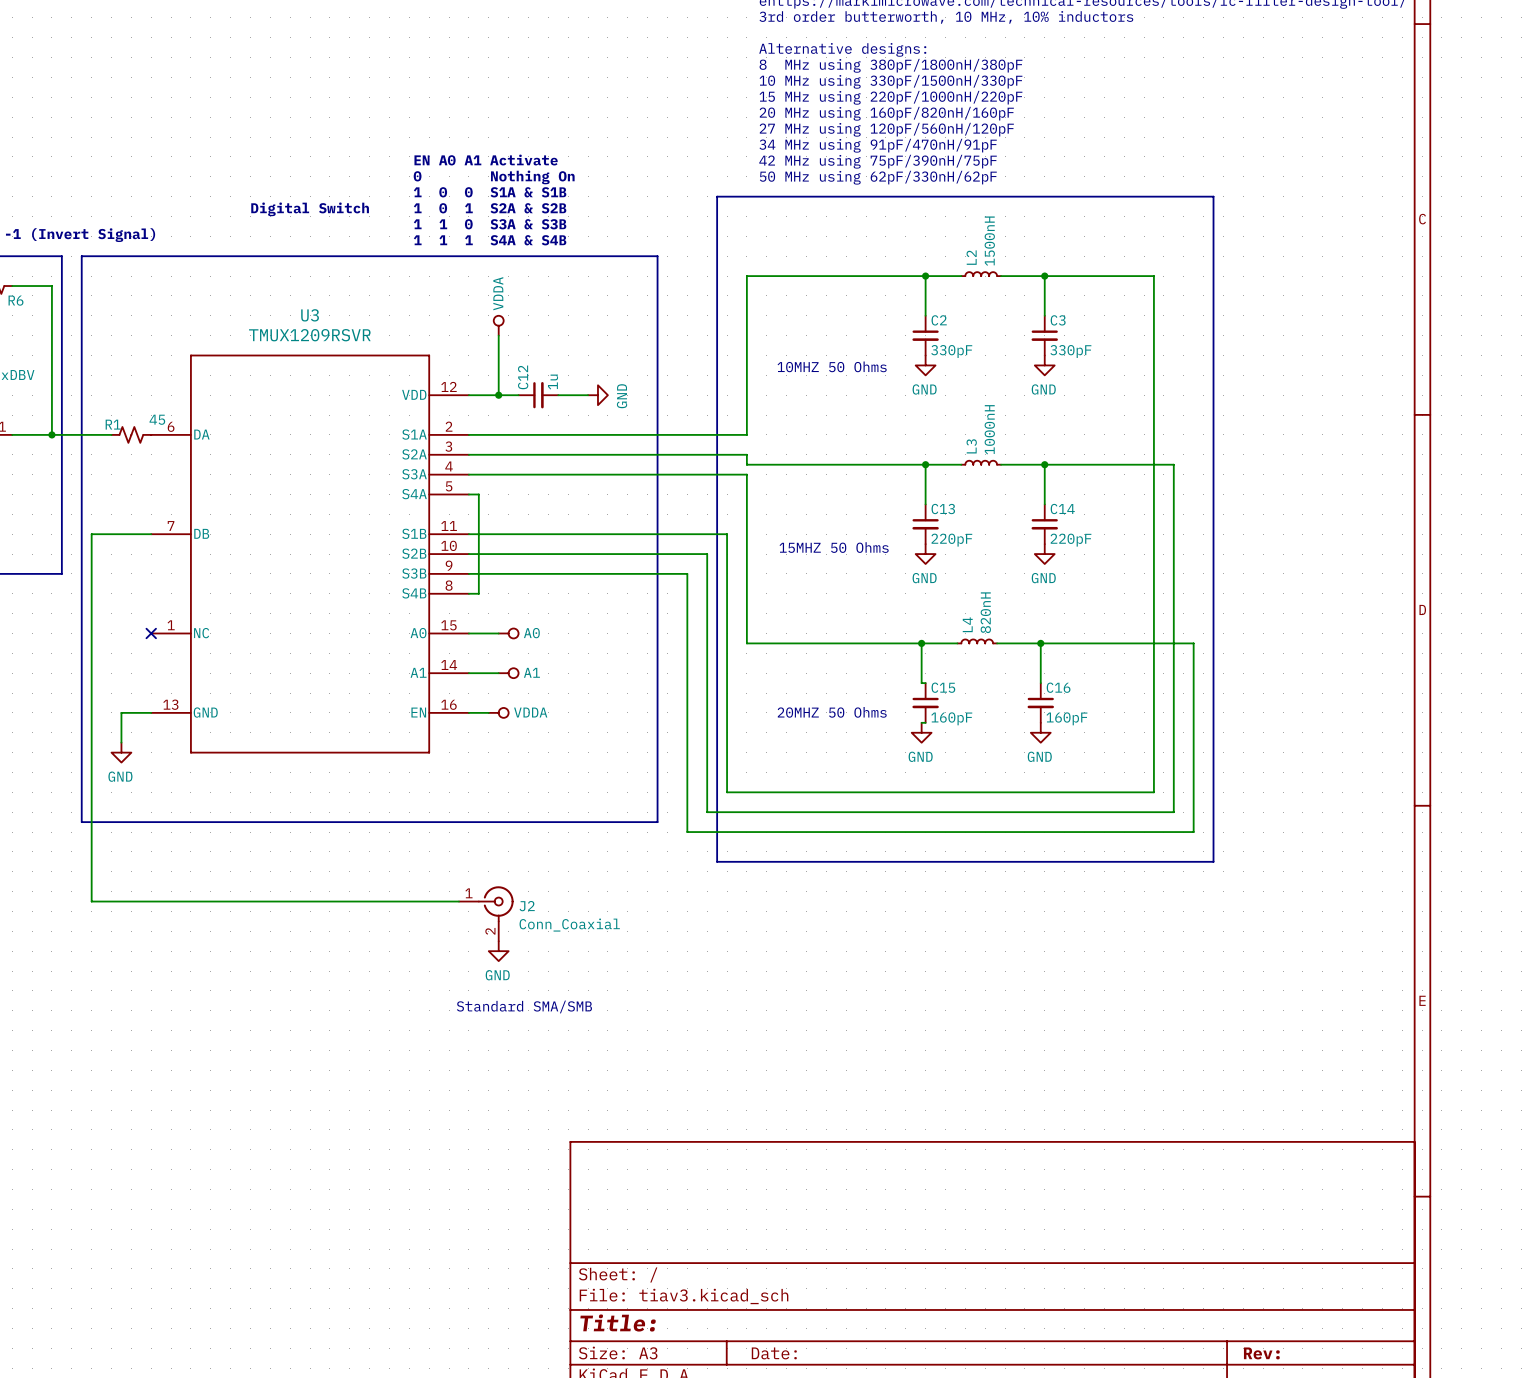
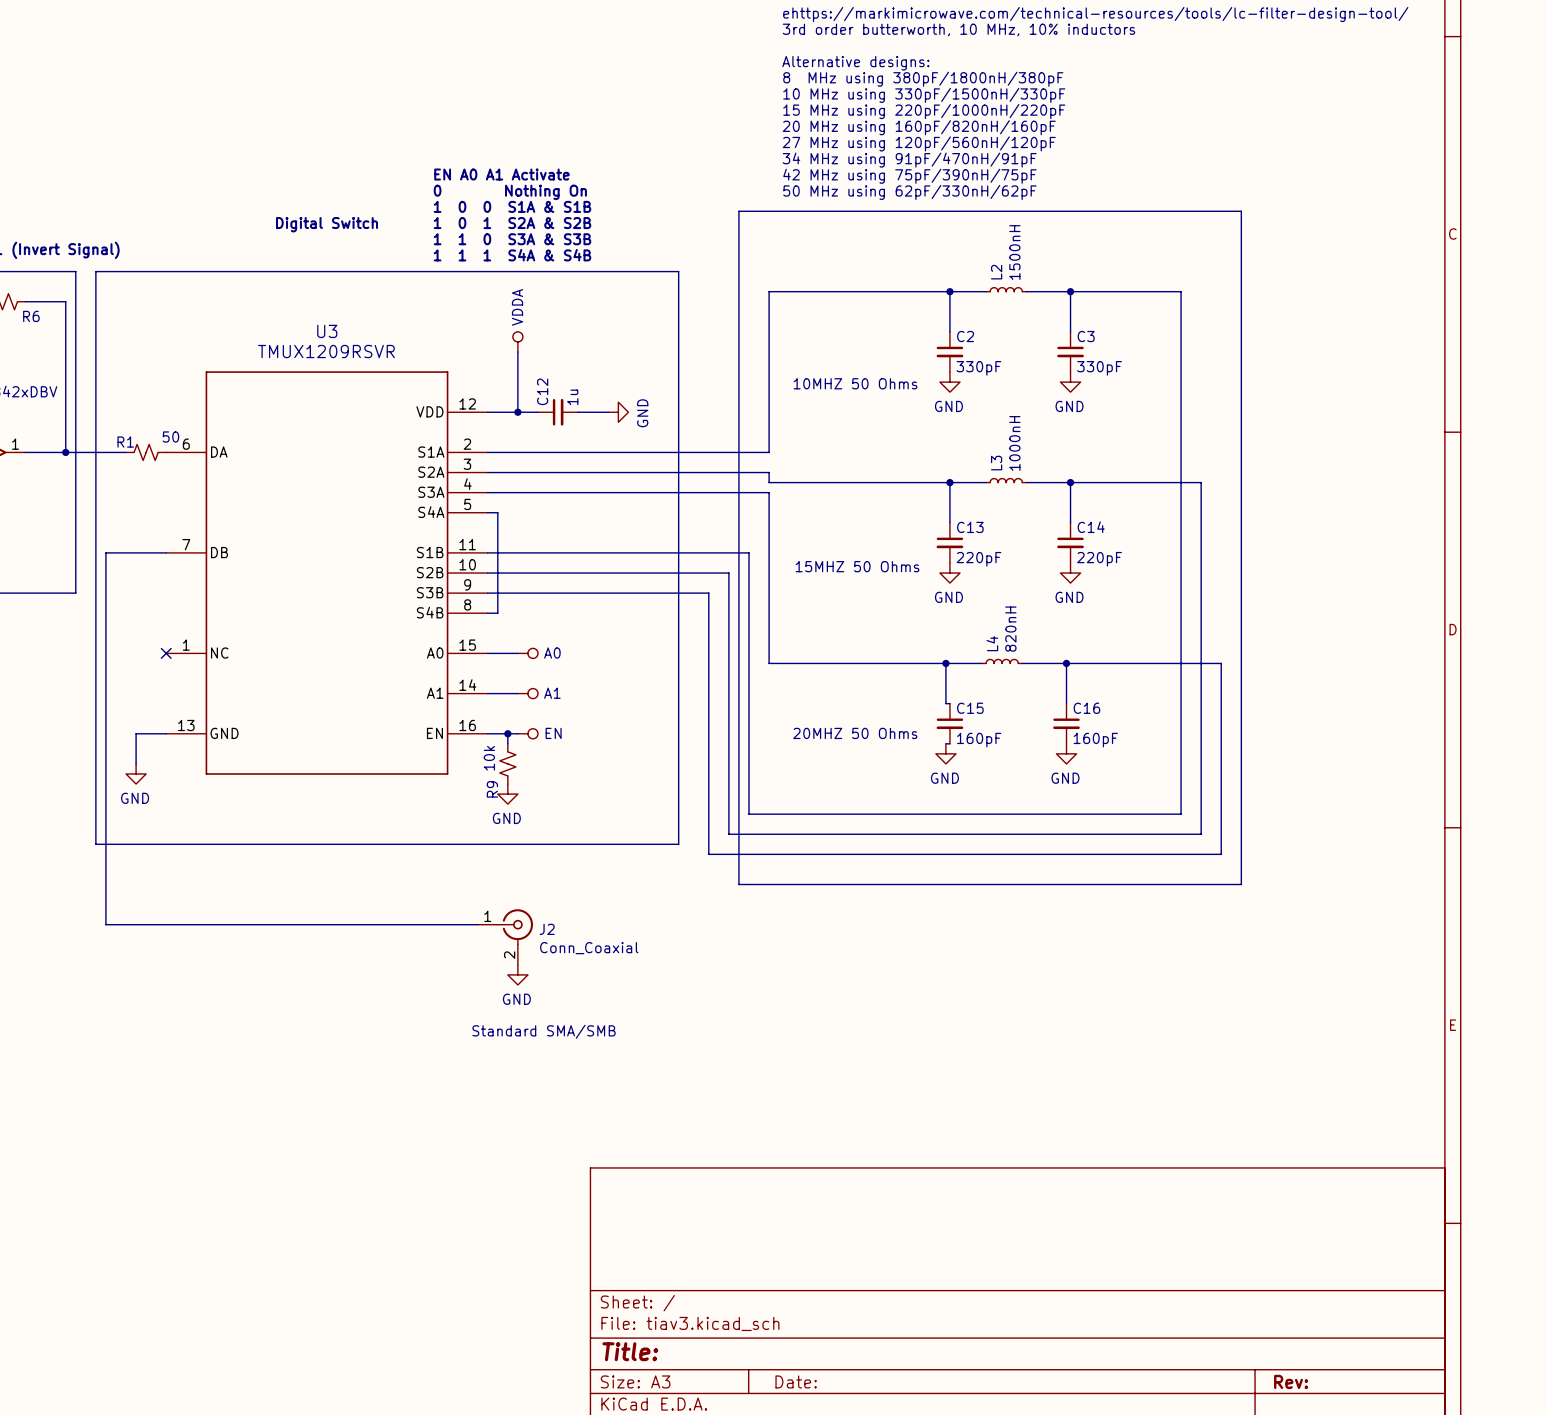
R1 value: 45 (157, 419) -> 50 (170, 437)
junction: none -> (507, 733)
power symbol: VDDA (498, 712) -> none
power symbol: none -> EN (527, 733)
R9: none -> 10k (507, 763)
power symbol: none -> GND (507, 794)

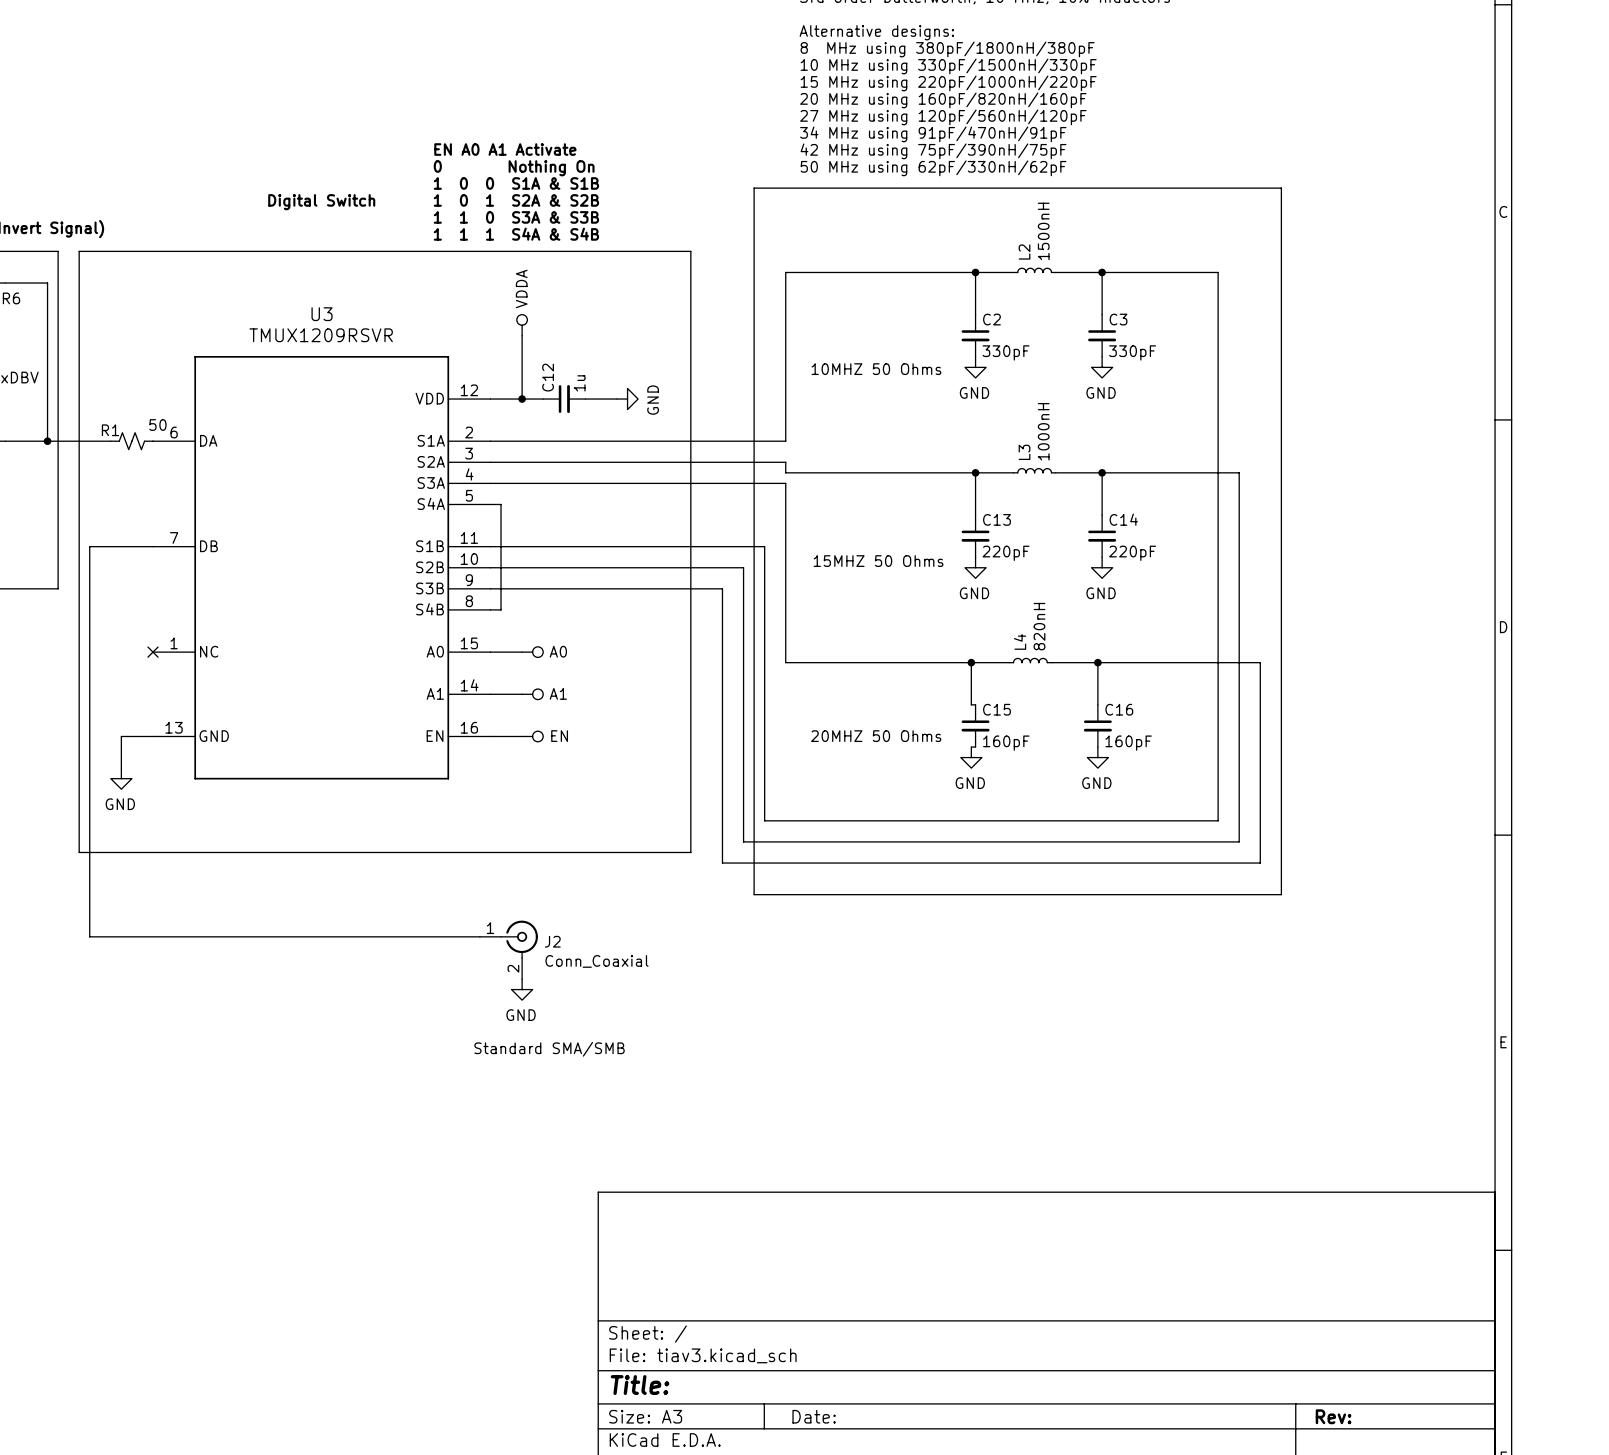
wire: (507, 733) (507, 743) -> none
junction: (507, 733) -> none
R9: 10k (507, 763) -> none
power symbol: GND (507, 794) -> none

